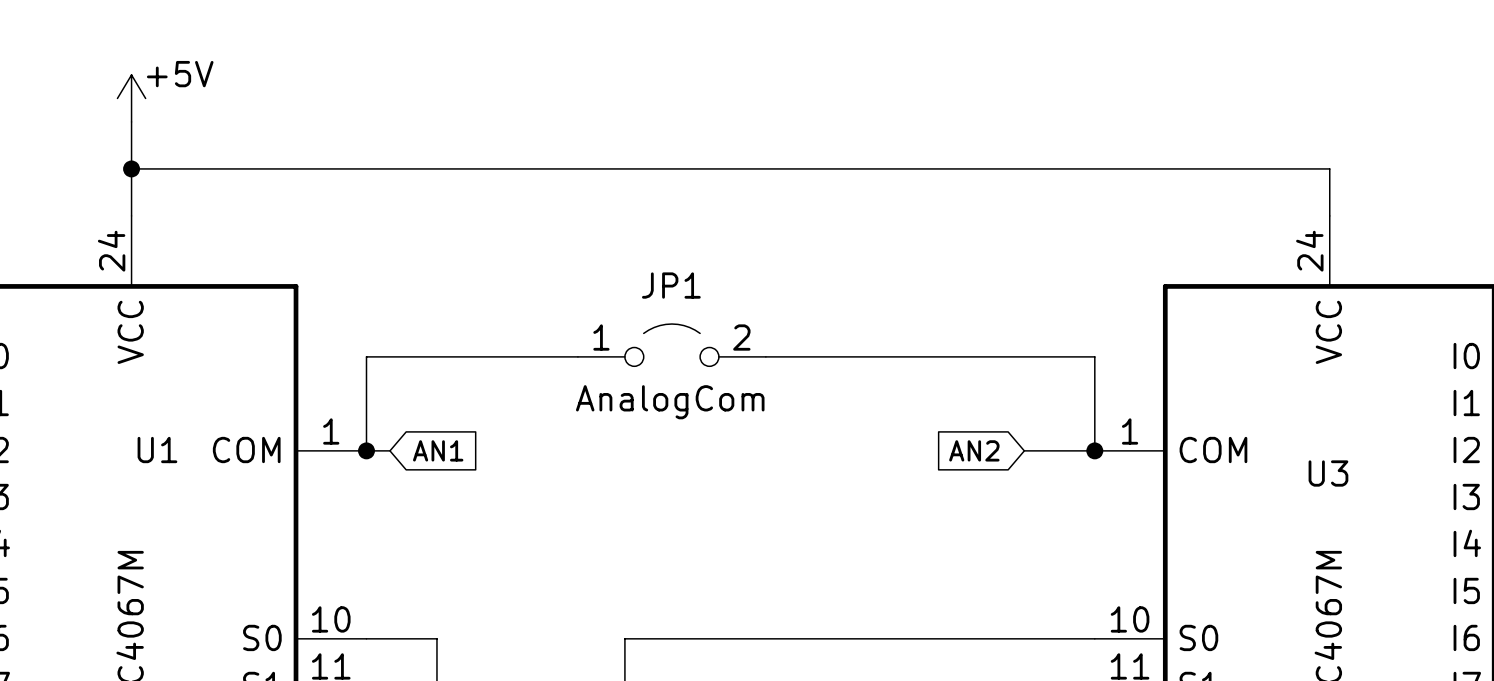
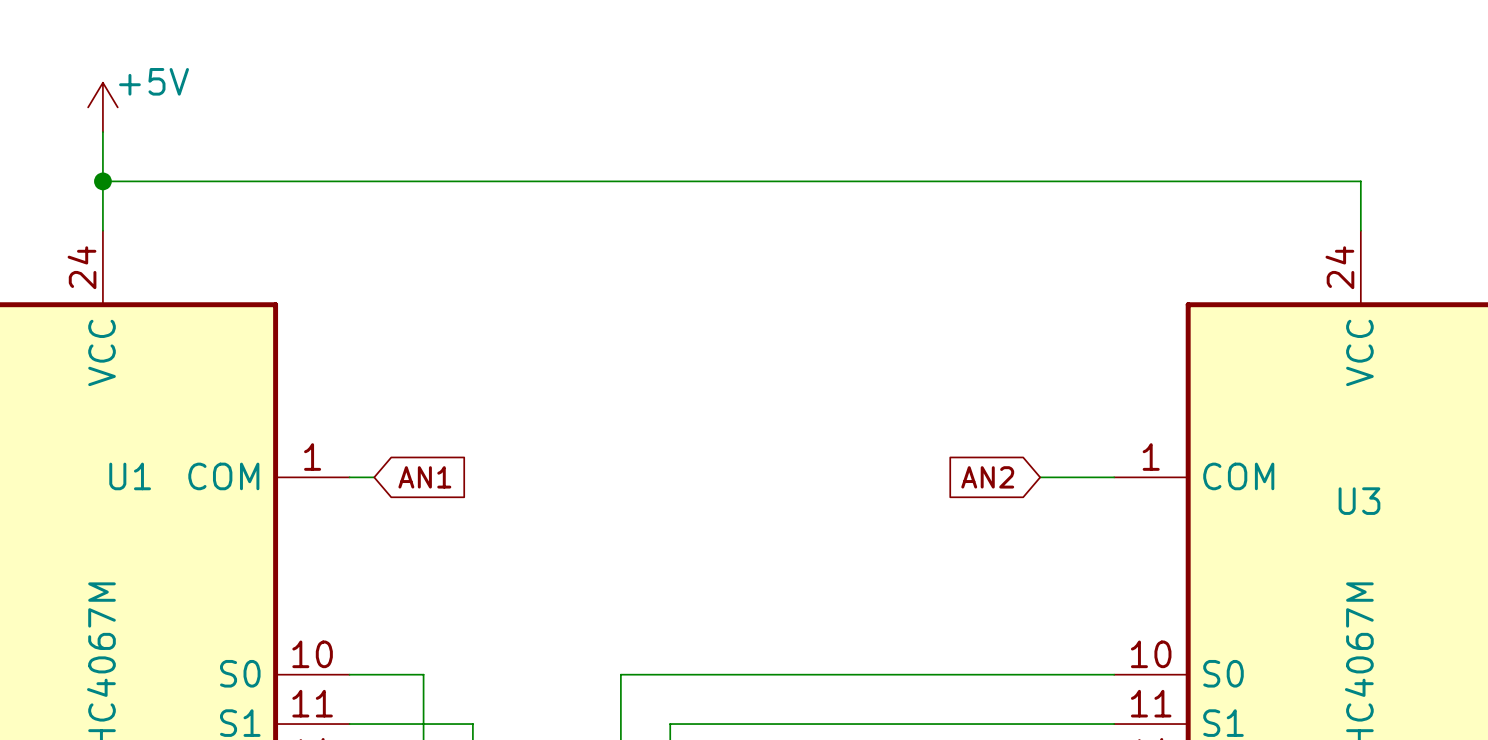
JP1: AnalogCom (671, 345) -> none
wire: (577, 356) (366, 356) (366, 450) -> none
wire: (765, 356) (1094, 356) (1094, 450) -> none
junction: (366, 450) -> none
junction: (1094, 450) -> none

